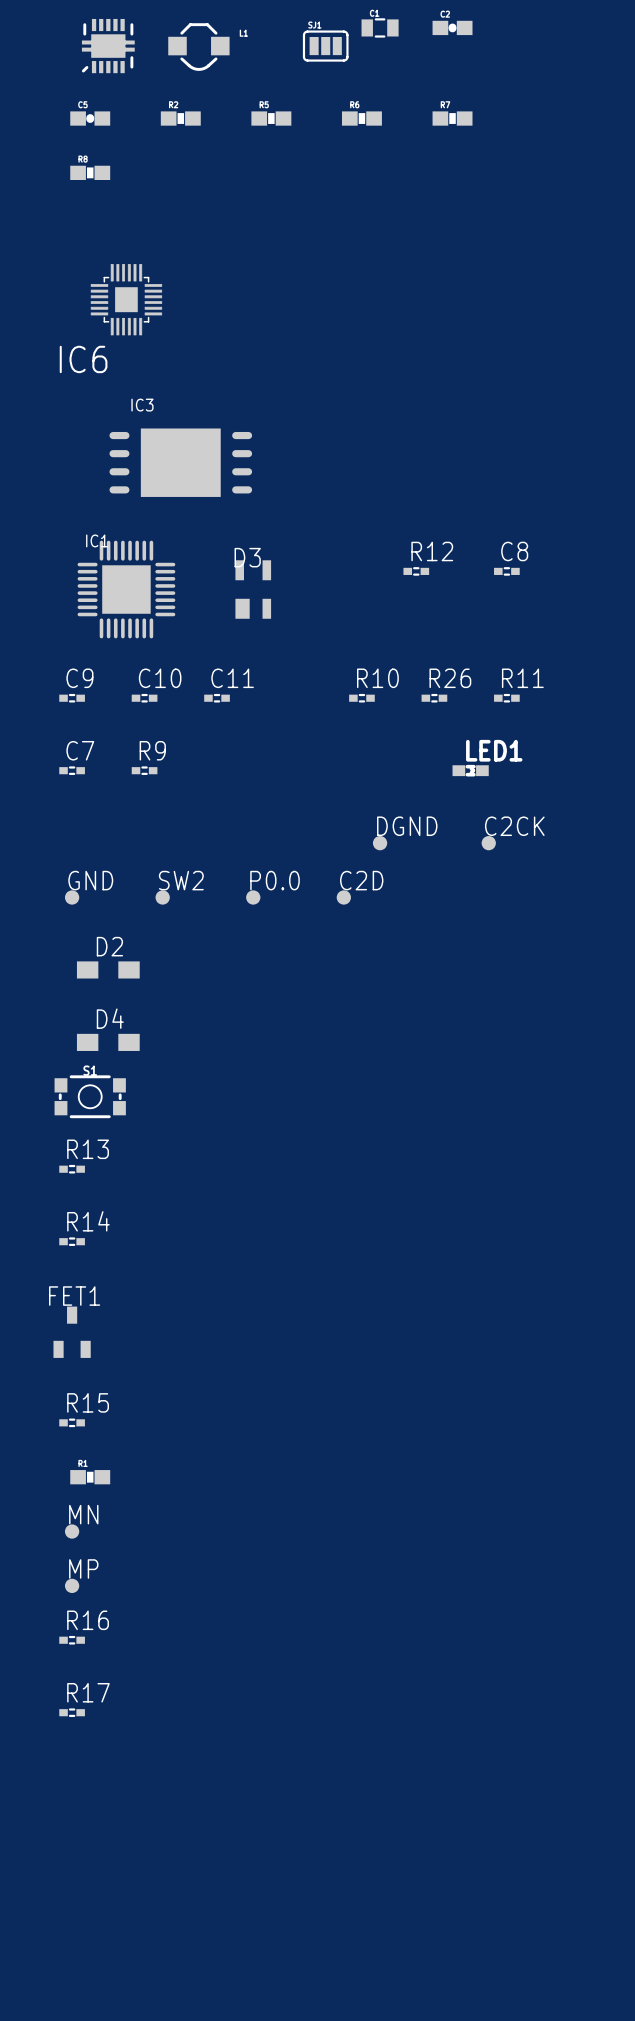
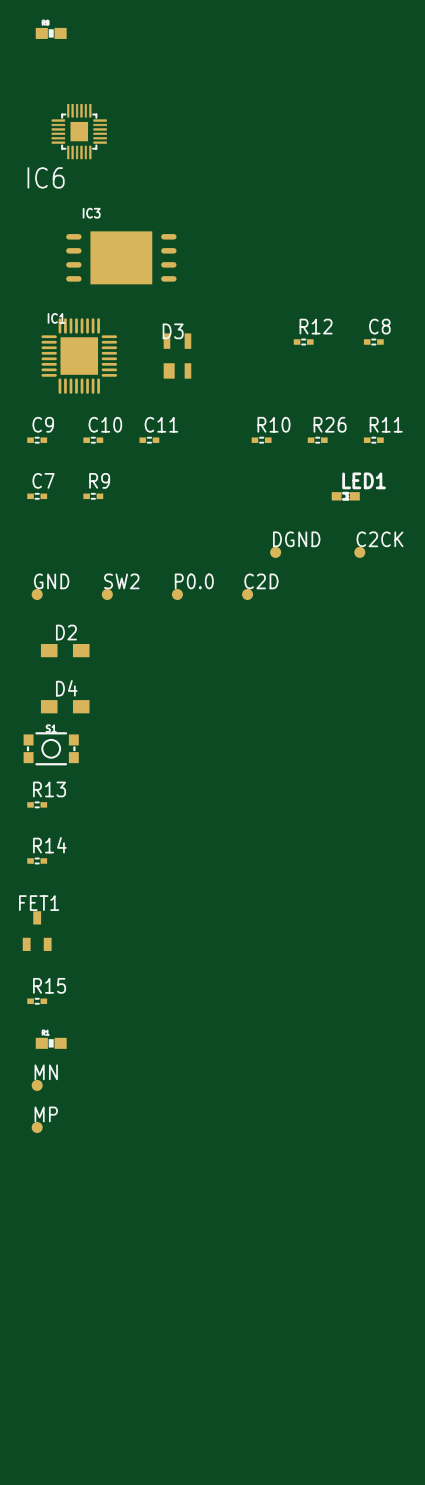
R16: (72, 1640) -> none
R17: (72, 1712) -> none

